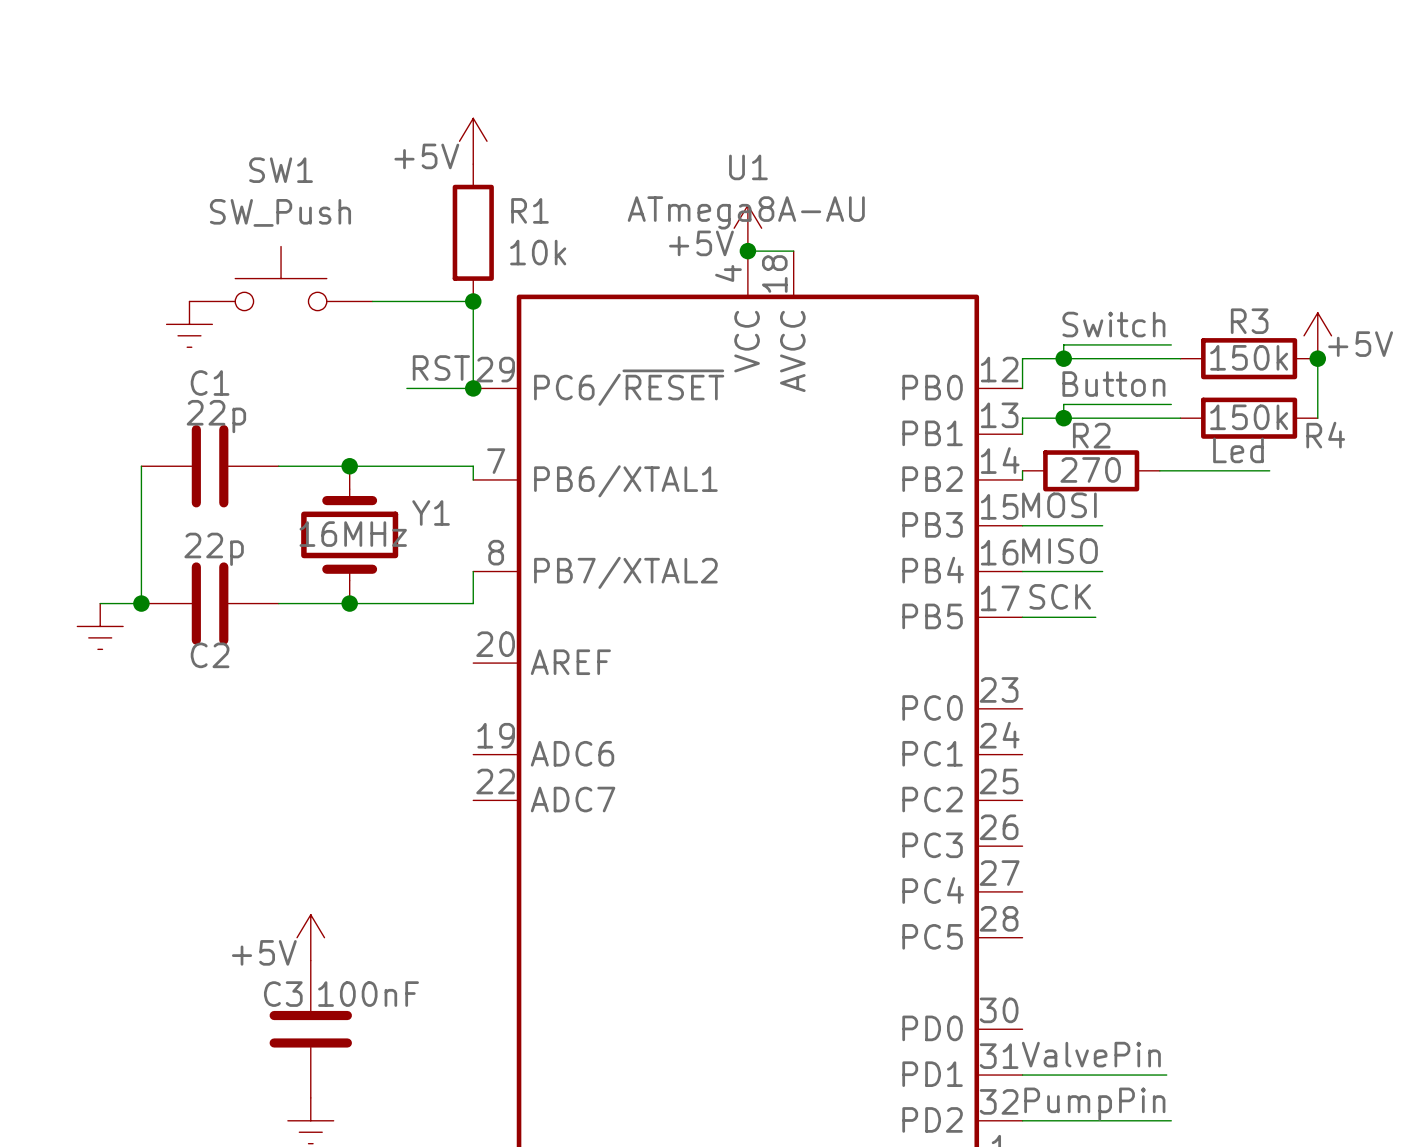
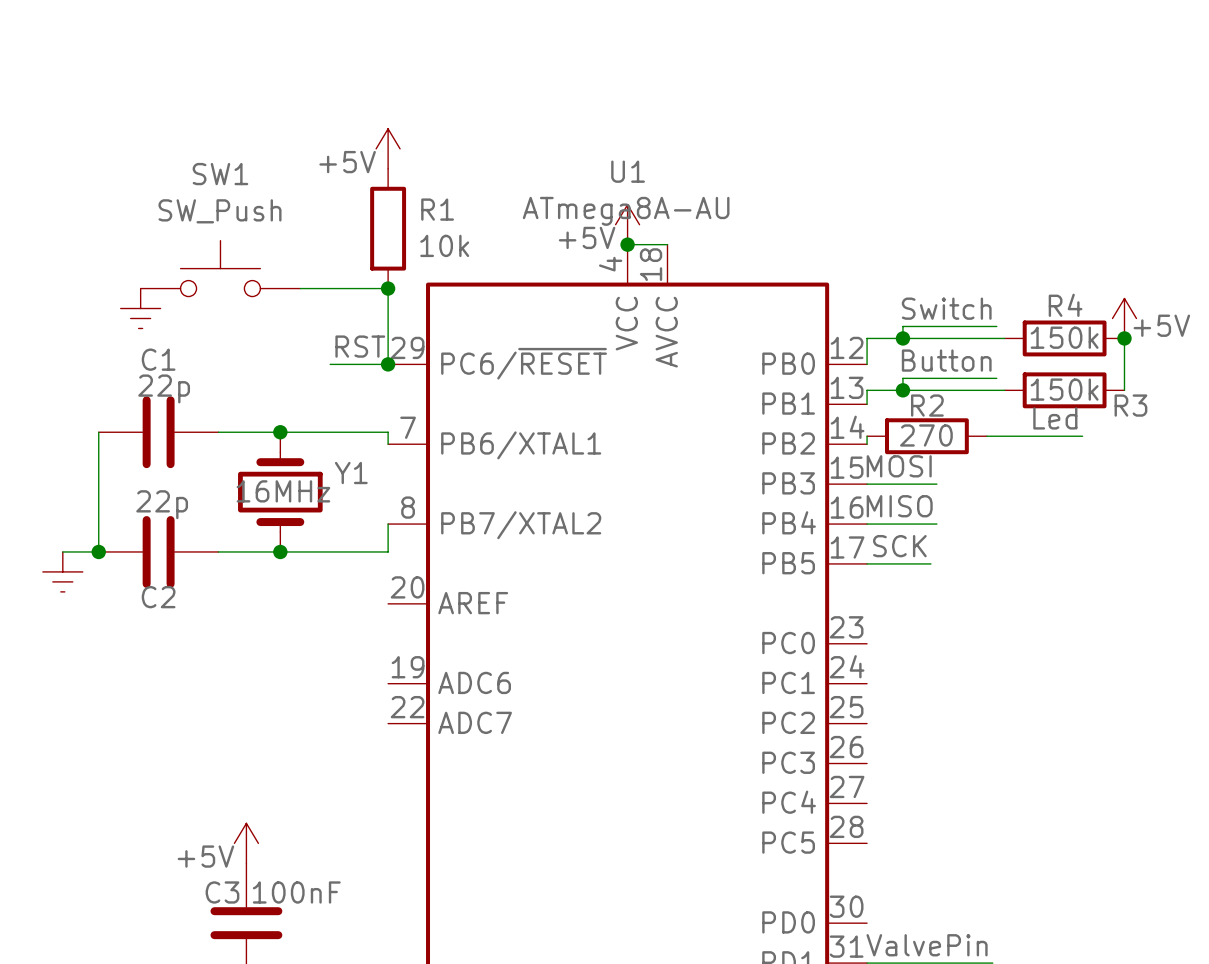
R3 name: R3 (1249, 321) -> R4 (1065, 305)
R4 name: R4 (1325, 435) -> R3 (1130, 405)

